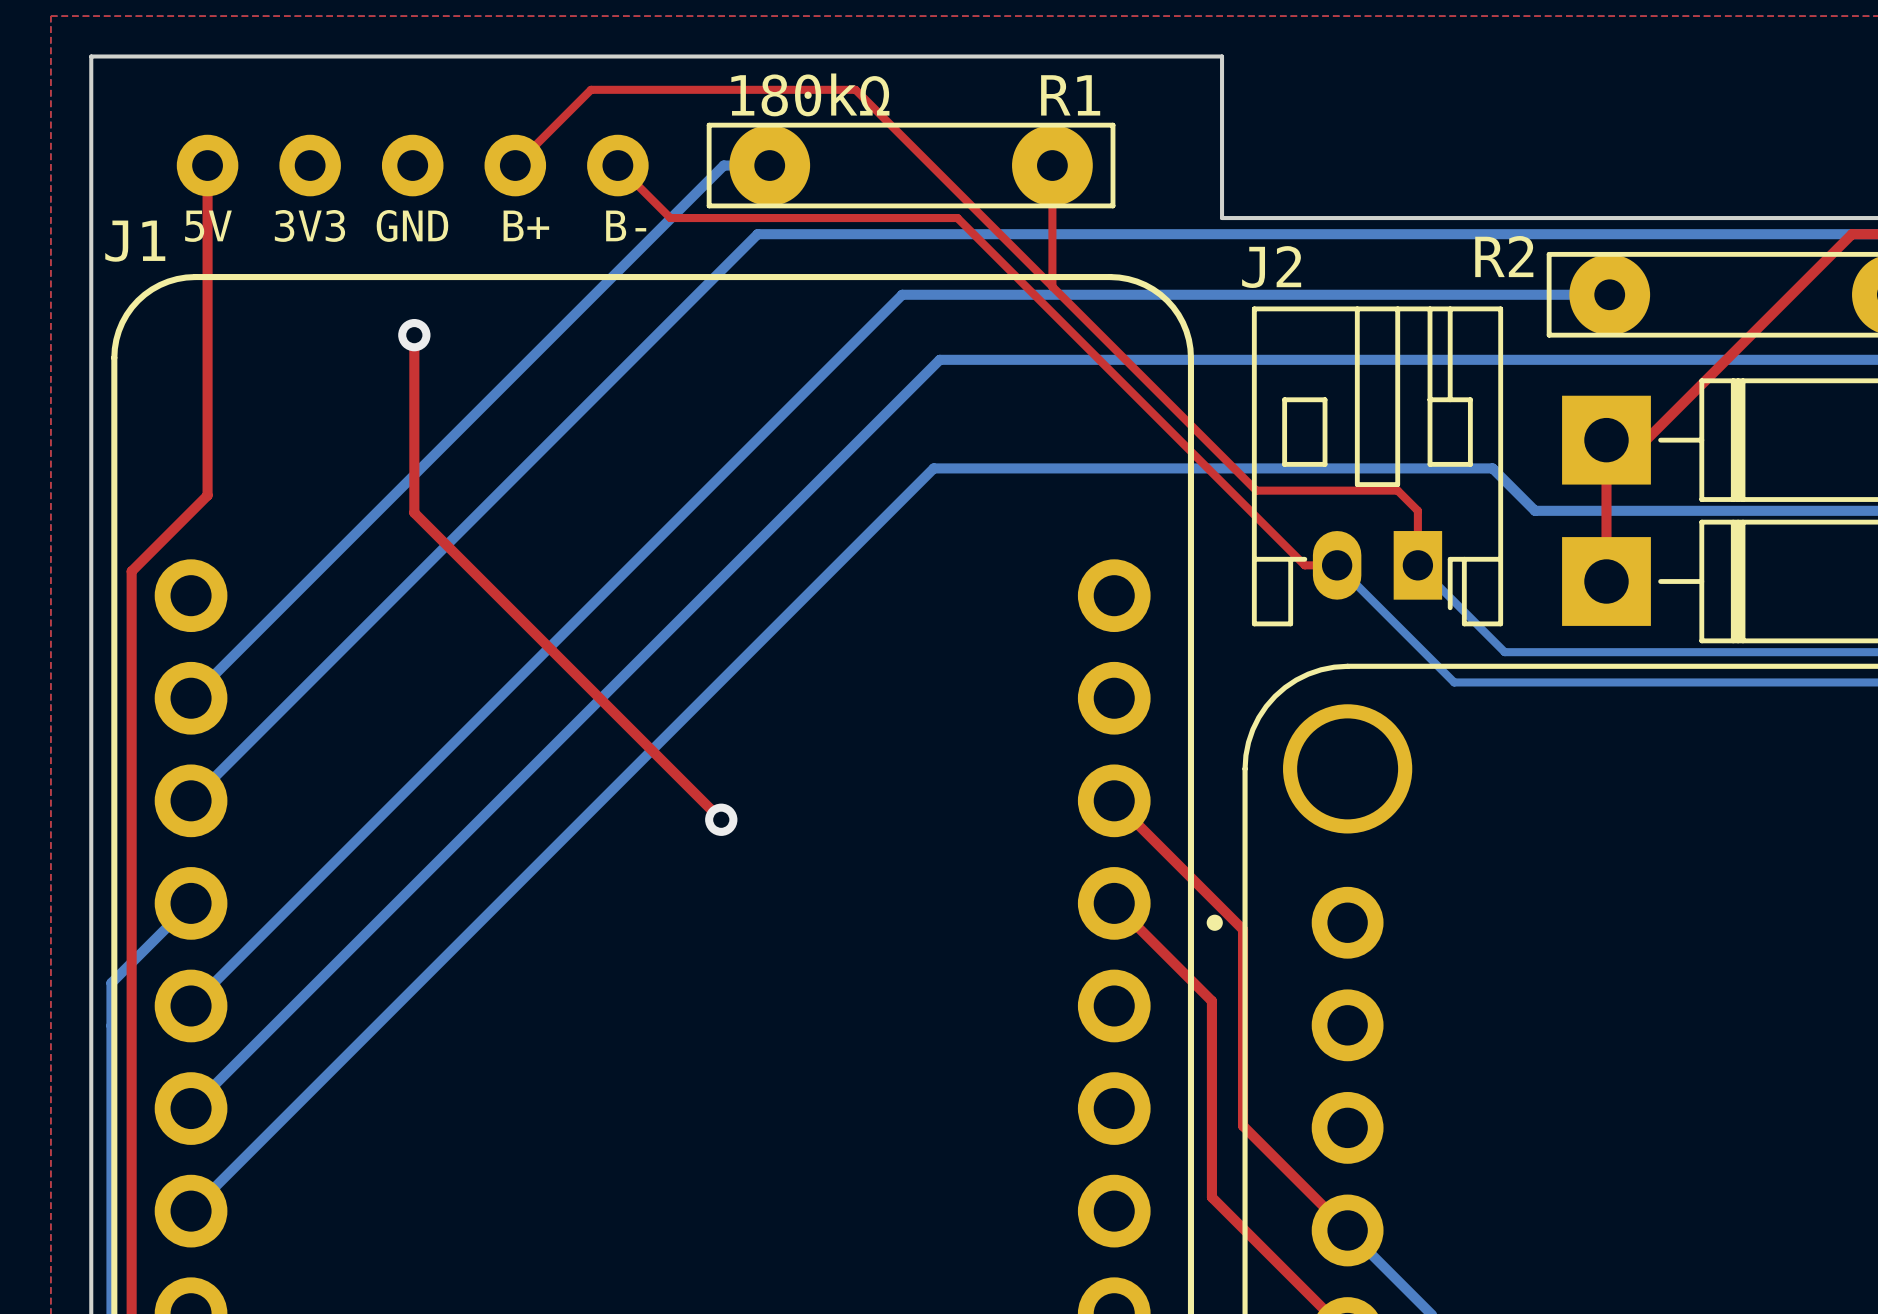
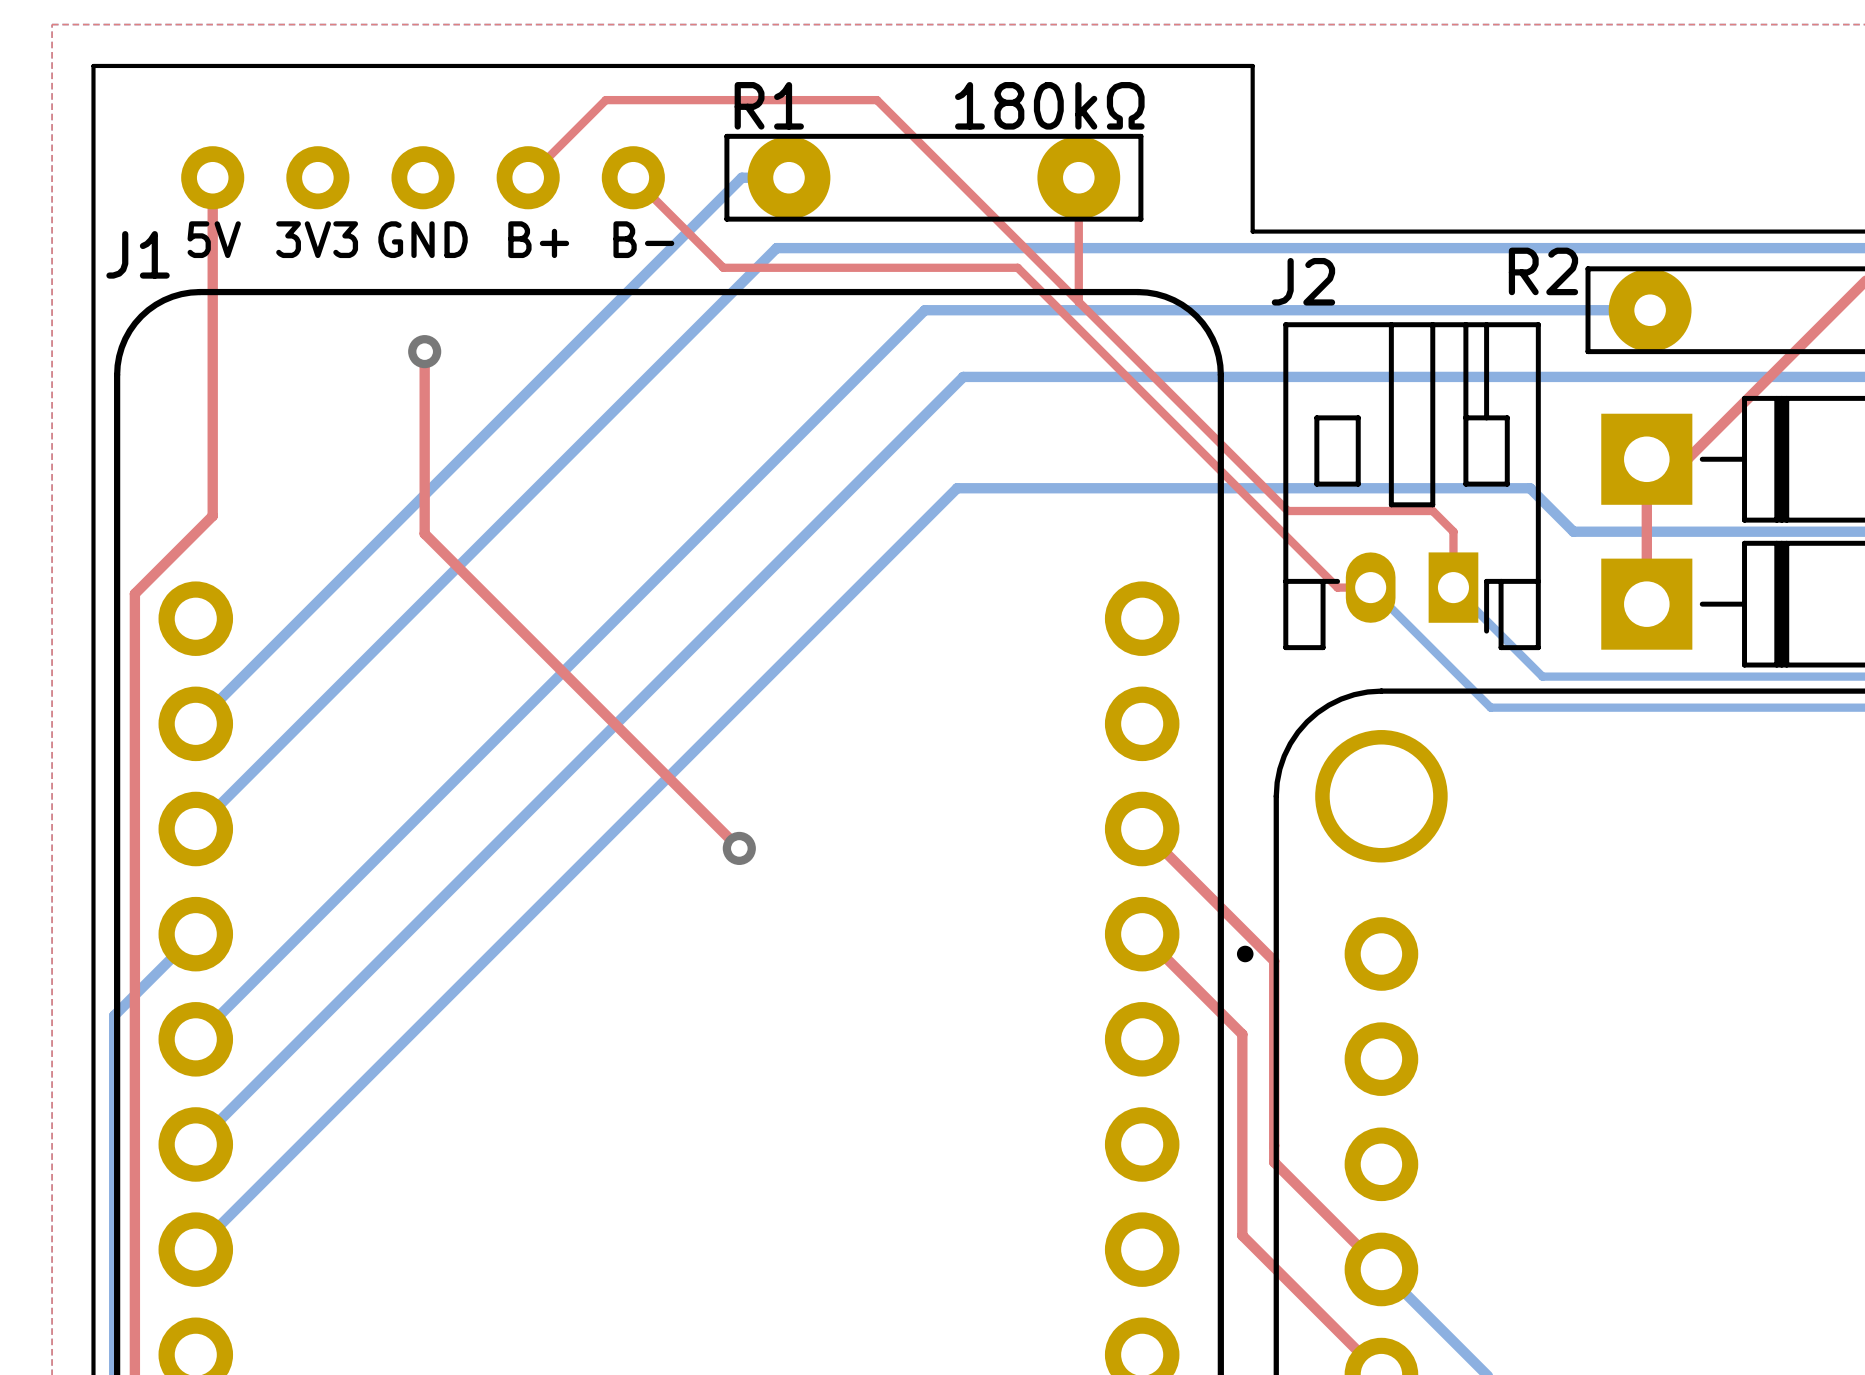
R1 text position: 180kΩ (810, 94) -> 180kΩ (1049, 105)
R1 name position: R1 (1070, 95) -> R1 (769, 105)
top track: (670, 218) (957, 218) (992, 253) -> (687, 231) (723, 267) (1017, 267)

